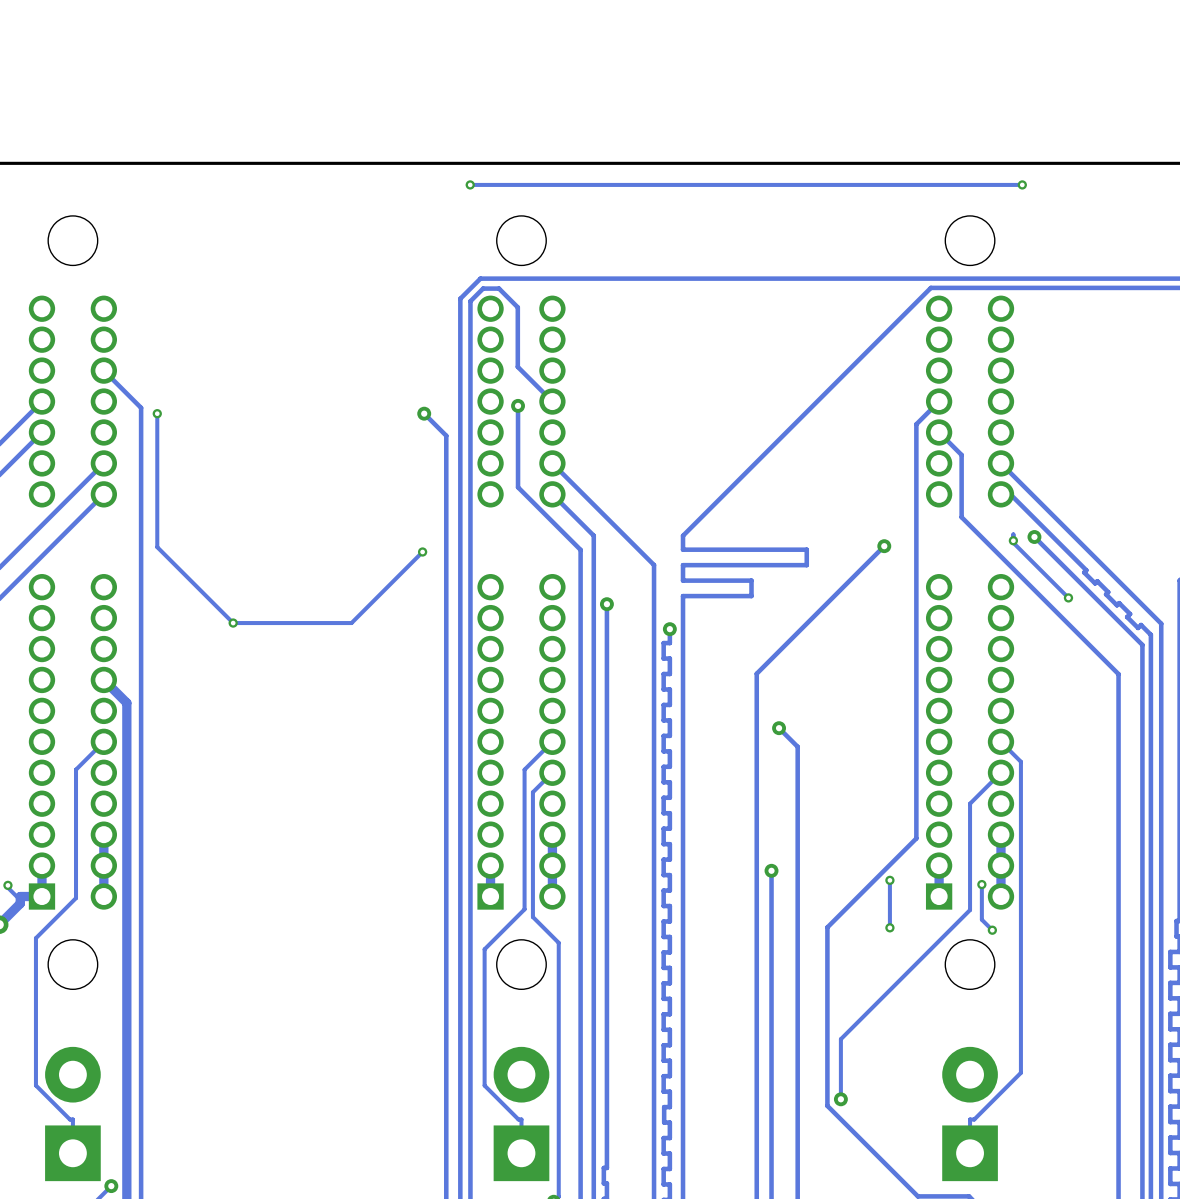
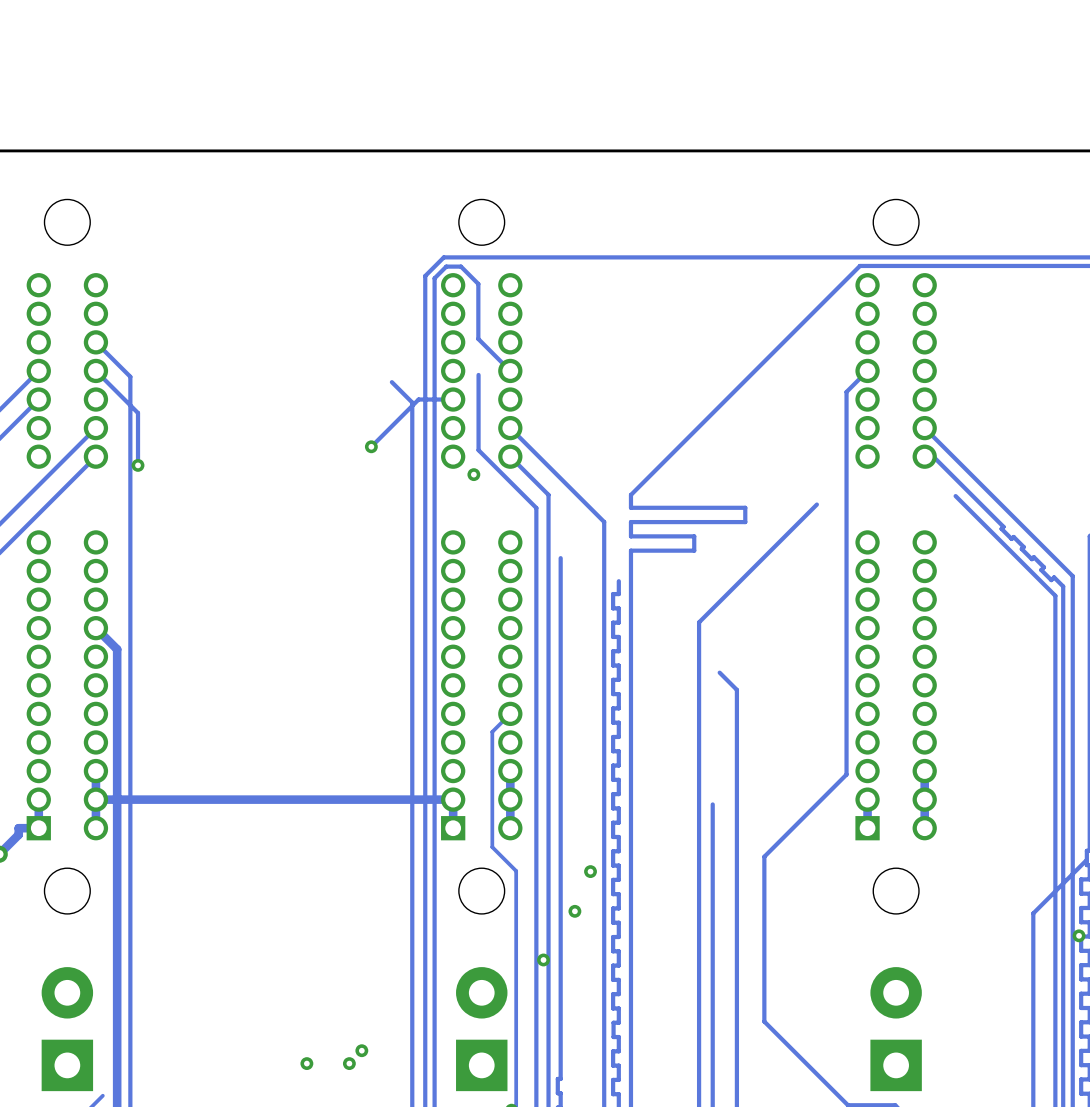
via: (470, 184) -> none
track: (1022, 184) (470, 184) -> none
via: (1022, 184) -> none
track: none -> (95, 370) (138, 413) (138, 465)
via: (518, 405) -> none
track: (157, 413) (157, 547) (233, 623) (351, 623) (422, 551) -> none
via: (157, 413) -> none
via: (424, 413) -> none
track: none -> (453, 399) (418, 399) (371, 446)
track: (939, 432) (961, 455) (961, 517) (1118, 674) (1118, 988) -> (1086, 860) (1033, 913)
via: none -> (371, 446)
via: none -> (138, 465)
via: none -> (473, 474)
track: (1013, 534) (1013, 542) (1068, 597) -> none
via: (1034, 536) -> none
via: (1013, 540) -> none
via: (884, 546) -> none
via: (422, 551) -> none
via: (1068, 597) -> none
via: (606, 604) -> none
via: (233, 623) -> none
via: (669, 629) -> none
via: (779, 728) -> none
track: (103, 741) (76, 769) (76, 898) (35, 938) (35, 1085) (69, 1119) (72, 1119) (72, 1153) -> none
track: (552, 741) (524, 769) (524, 909) (484, 949) (484, 1085) (518, 1119) (521, 1119) (521, 1153) -> none
track: (1000, 741) (1020, 761) (1020, 1072) (974, 1119) (970, 1119) (970, 1153) -> none
track: (1000, 772) (970, 803) (970, 910) (840, 1039) (840, 1099) -> none
track: none -> (453, 799) (95, 799)
via: (771, 870) -> none
track: (889, 880) (889, 927) -> none
via: (889, 880) -> none
track: (981, 884) (981, 919) (992, 930) -> none
via: (981, 884) -> none
track: (7, 885) (7, 887) (20, 900) -> none
via: (7, 885) -> none
via: (889, 927) -> none
via: (992, 930) -> none
via: none -> (590, 871)
via: none -> (574, 911)
via: none -> (1079, 935)
via: none -> (543, 959)
via: (840, 1099) -> none
via: none -> (361, 1050)
via: none -> (306, 1063)
via: none -> (349, 1063)
via: (111, 1186) -> none

